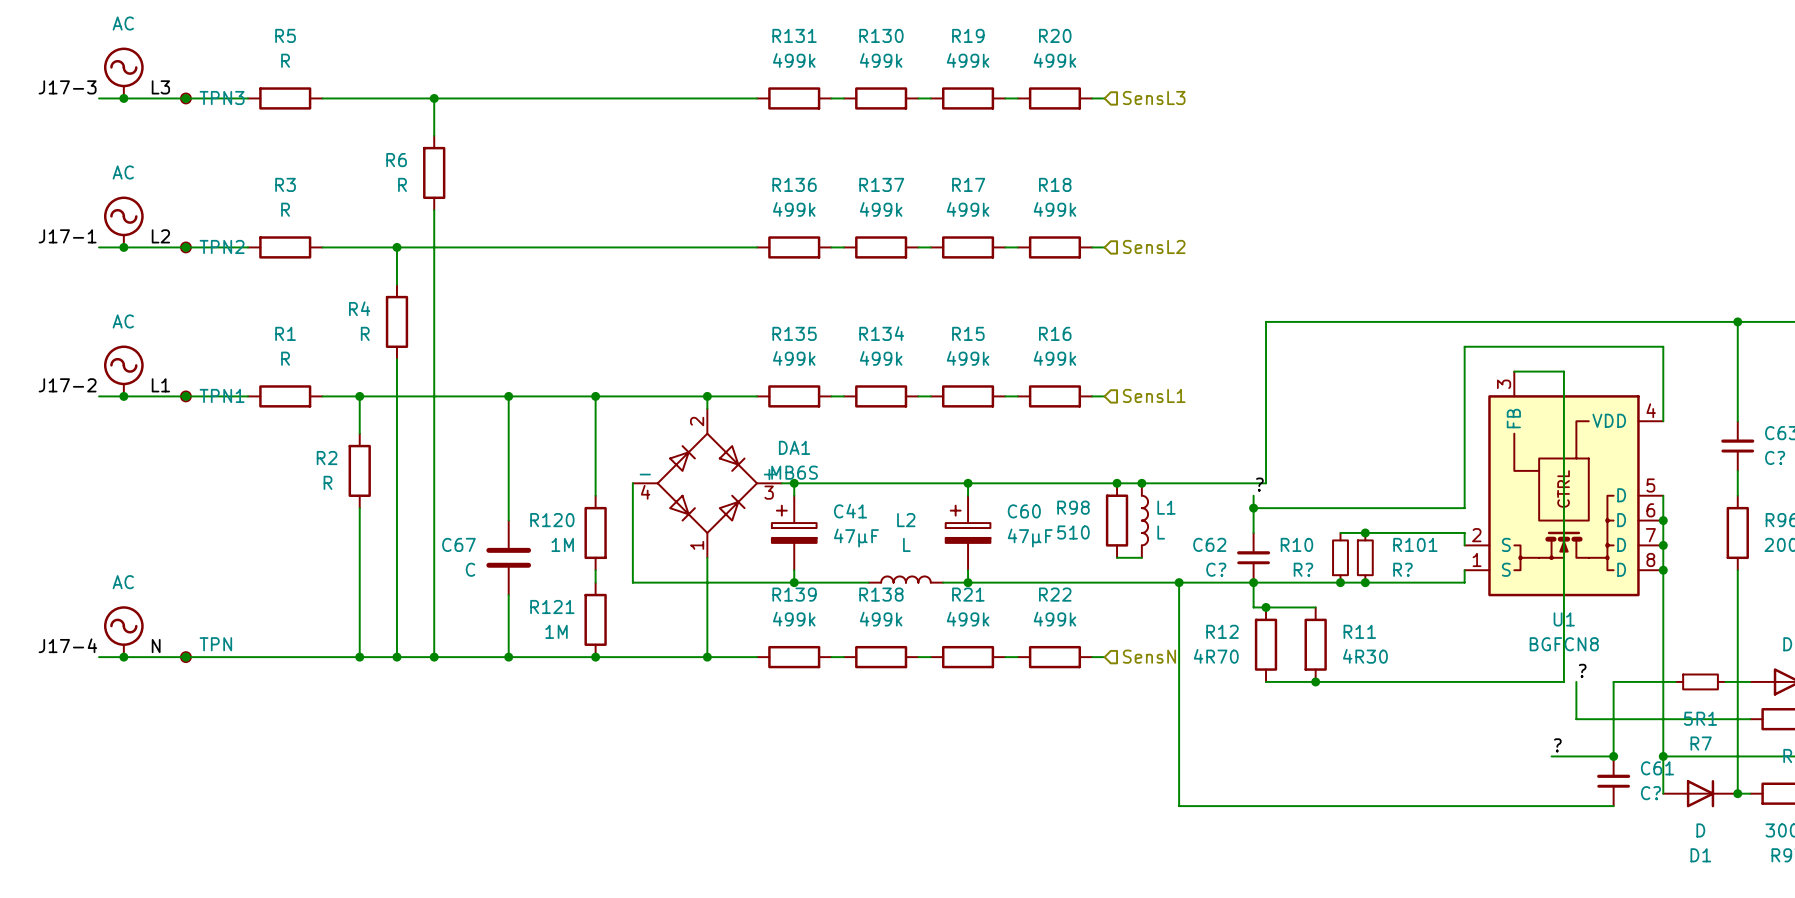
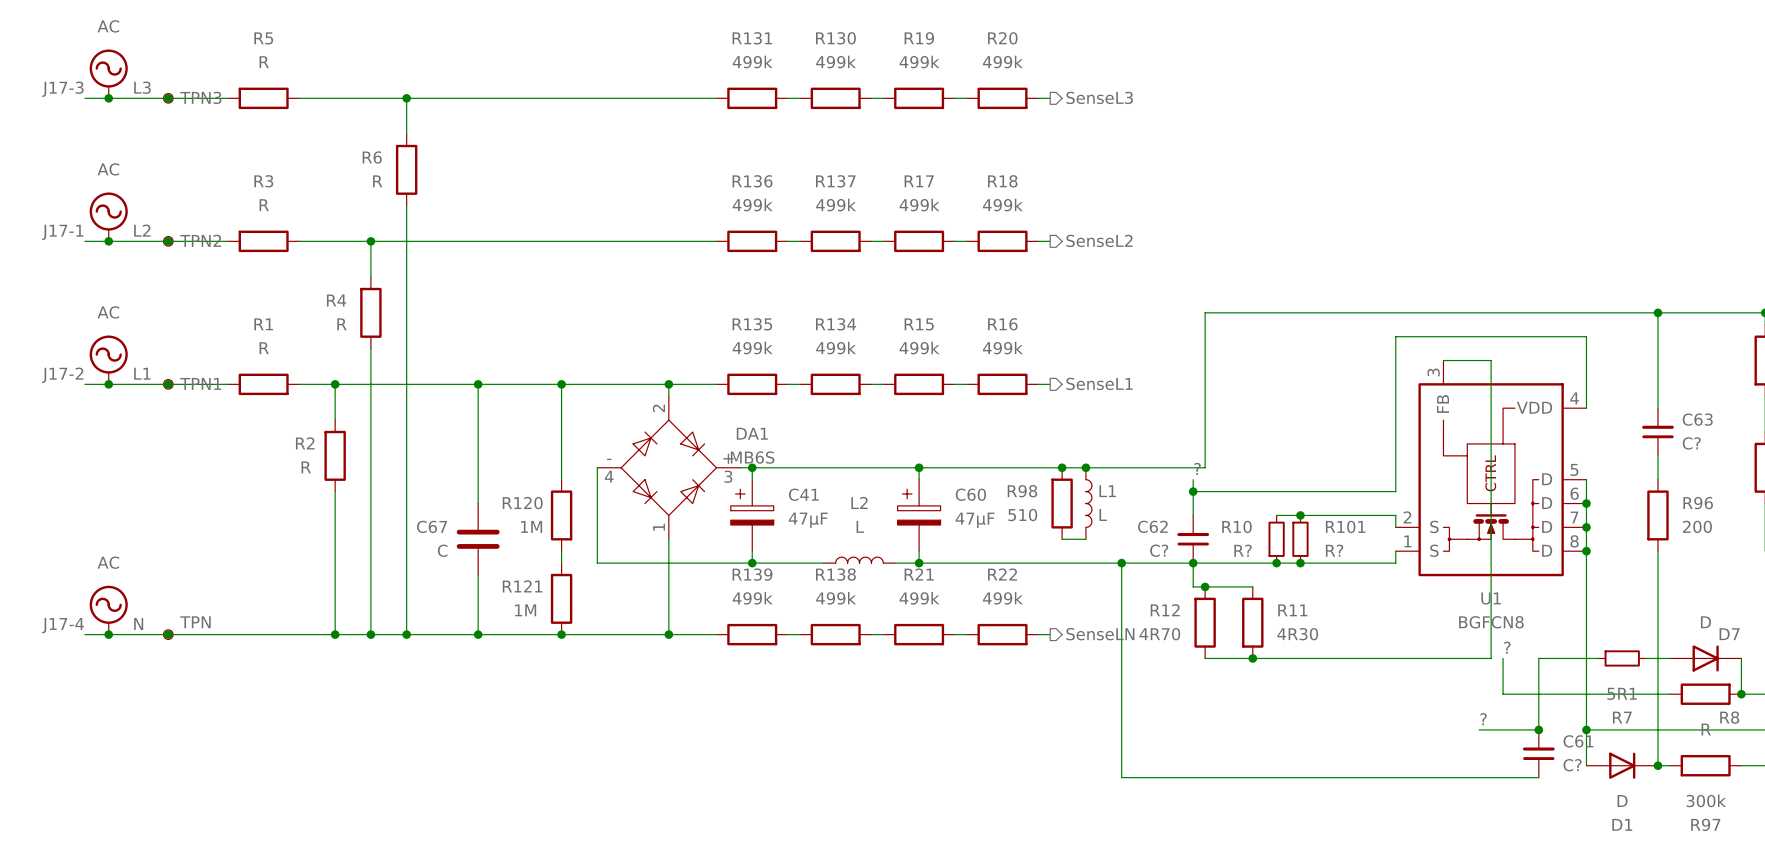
hierarchical label shape: input (1154, 97) -> output (1099, 97)
hierarchical label: SensL3 (1154, 97) -> SenseL3 (1099, 97)
hierarchical label shape: input (1154, 246) -> output (1099, 240)
hierarchical label: SensL2 (1154, 246) -> SenseL2 (1099, 240)
hierarchical label shape: input (1154, 395) -> output (1099, 383)
hierarchical label: SensL1 (1154, 395) -> SenseL1 (1099, 383)
hierarchical label shape: input (1149, 656) -> output (1100, 634)
hierarchical label: SensN (1149, 656) -> SenseLN (1100, 634)

